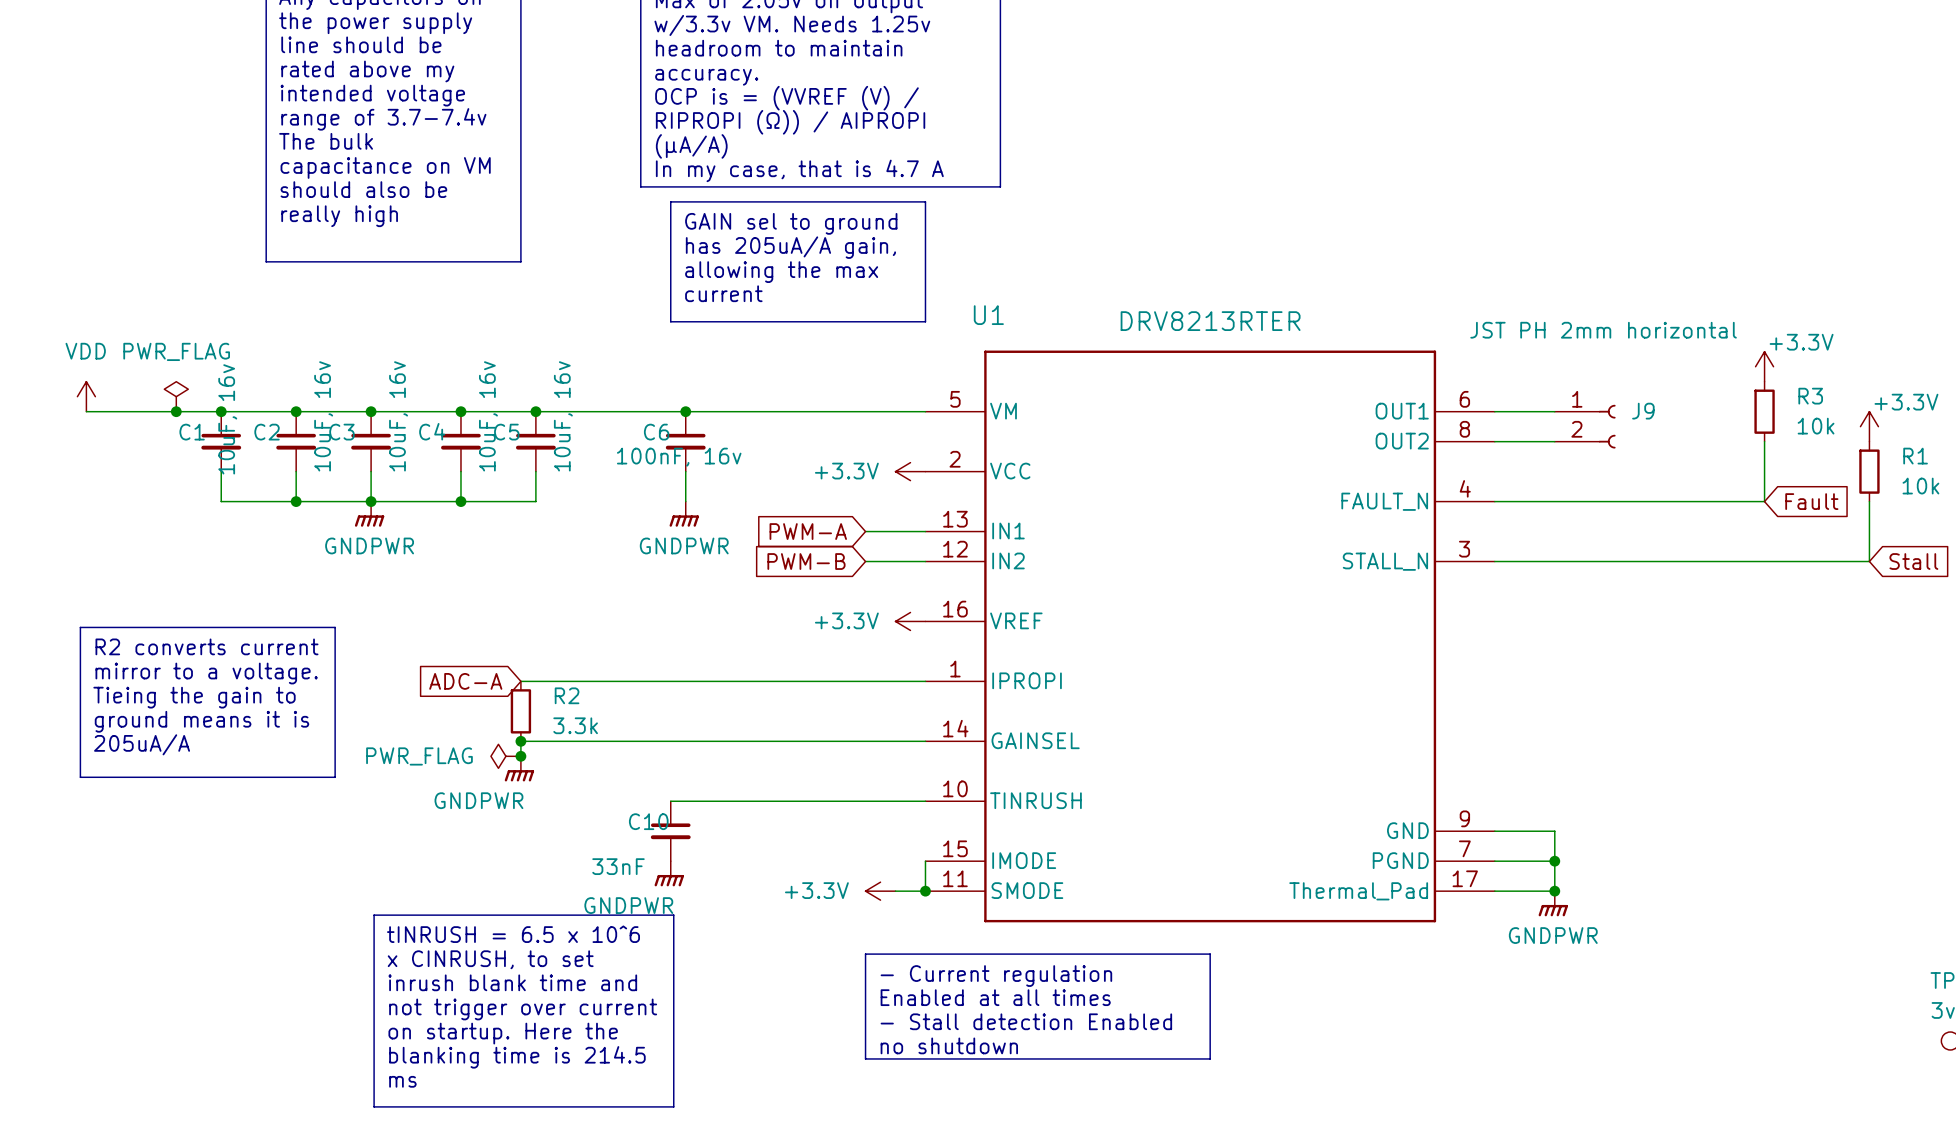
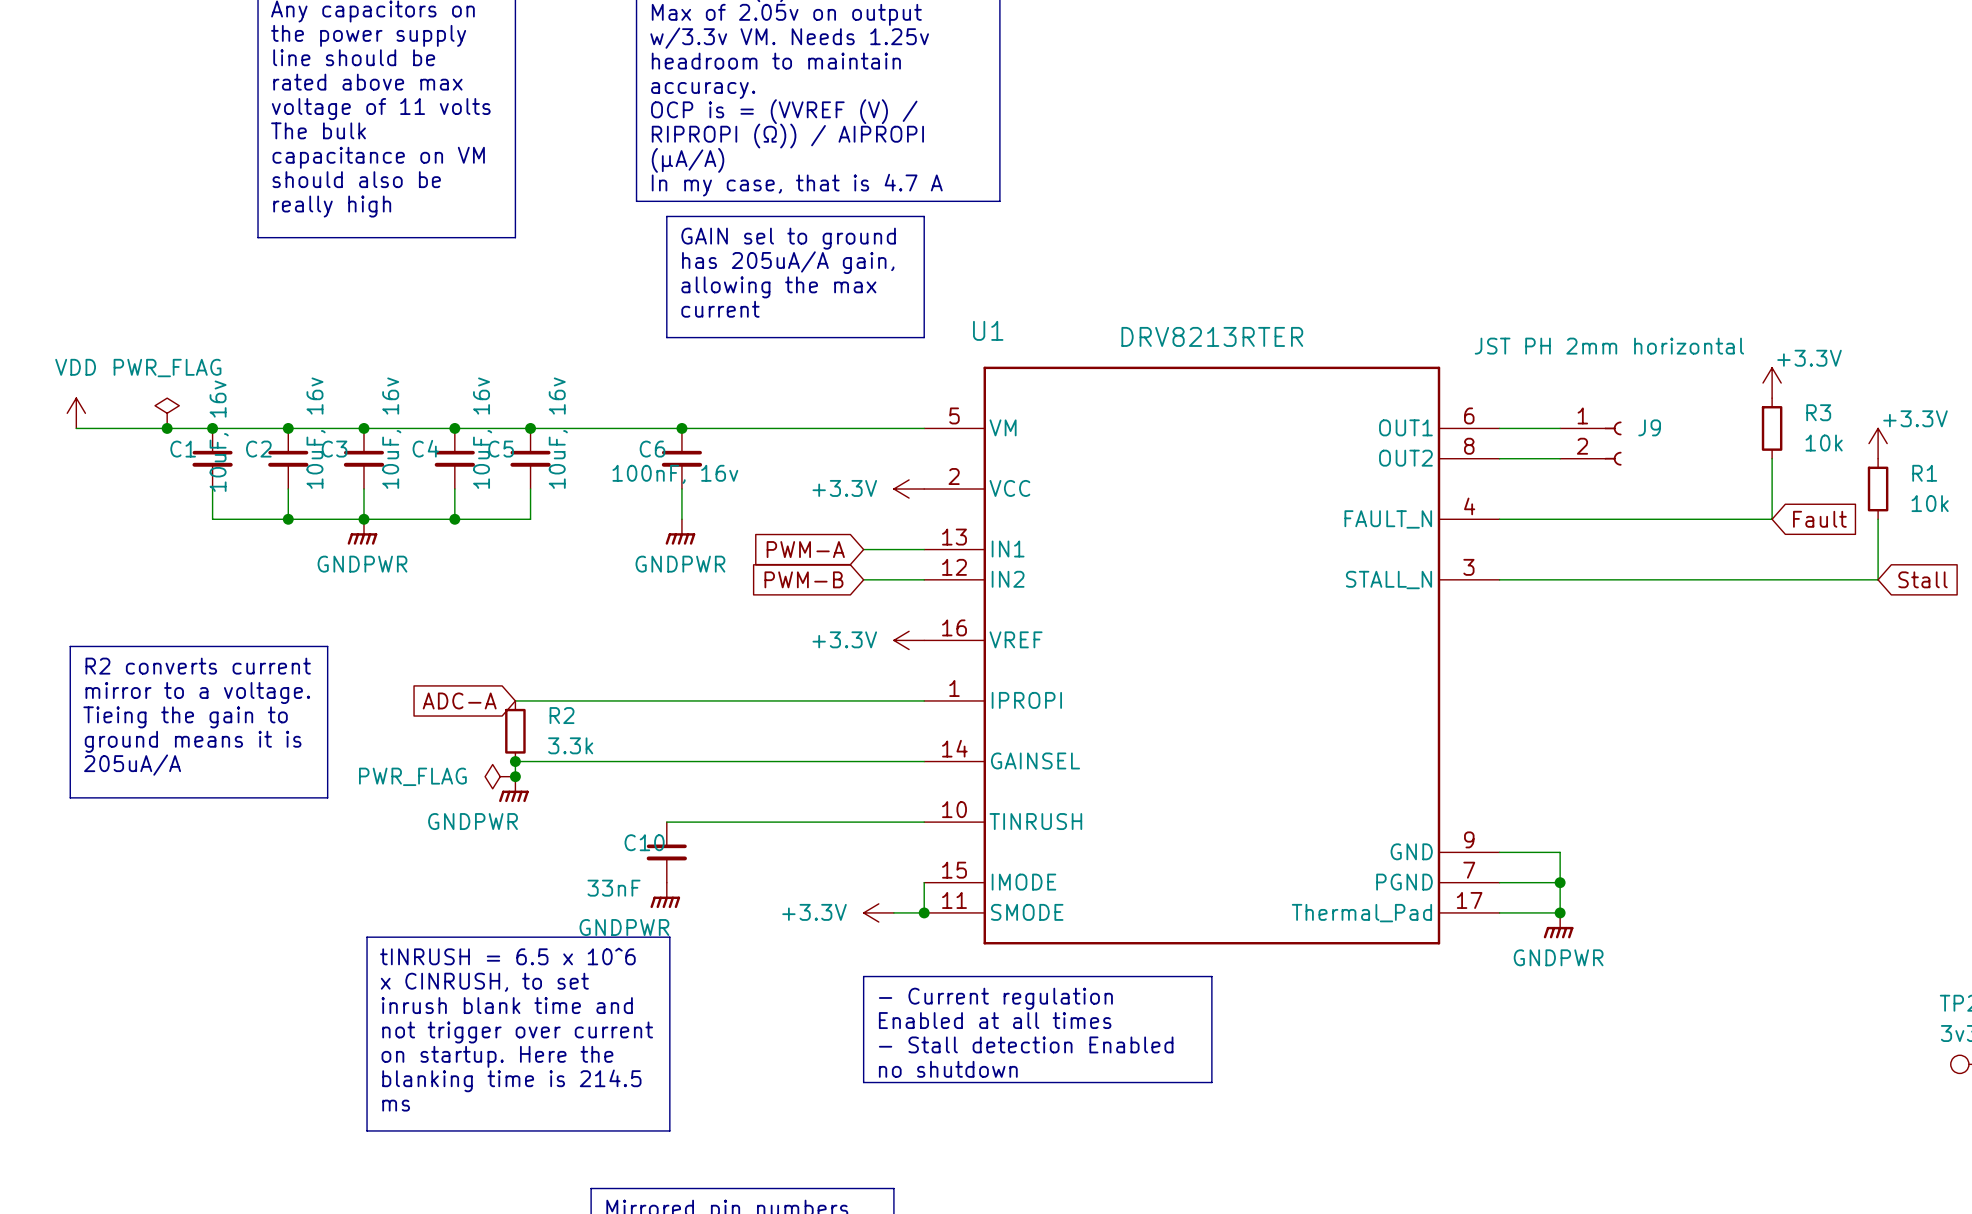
text: rated above my (367, 71) -> rated above max (367, 82)
text: intended voltage (372, 95) -> voltage of 11 volts (381, 109)
text: range of 3.7-7.4v (383, 119) -> The bulk (318, 130)
text: The bulk (326, 141) -> capacitance on VM (378, 157)
text: capacitance on VM (385, 167) -> should also be (356, 179)
text: should also be (363, 189) -> really high (332, 206)
text: really high (339, 216) -> none
line: (266, 222) (266, 261) (520, 261) (520, 222) -> (258, 237) (515, 237)

